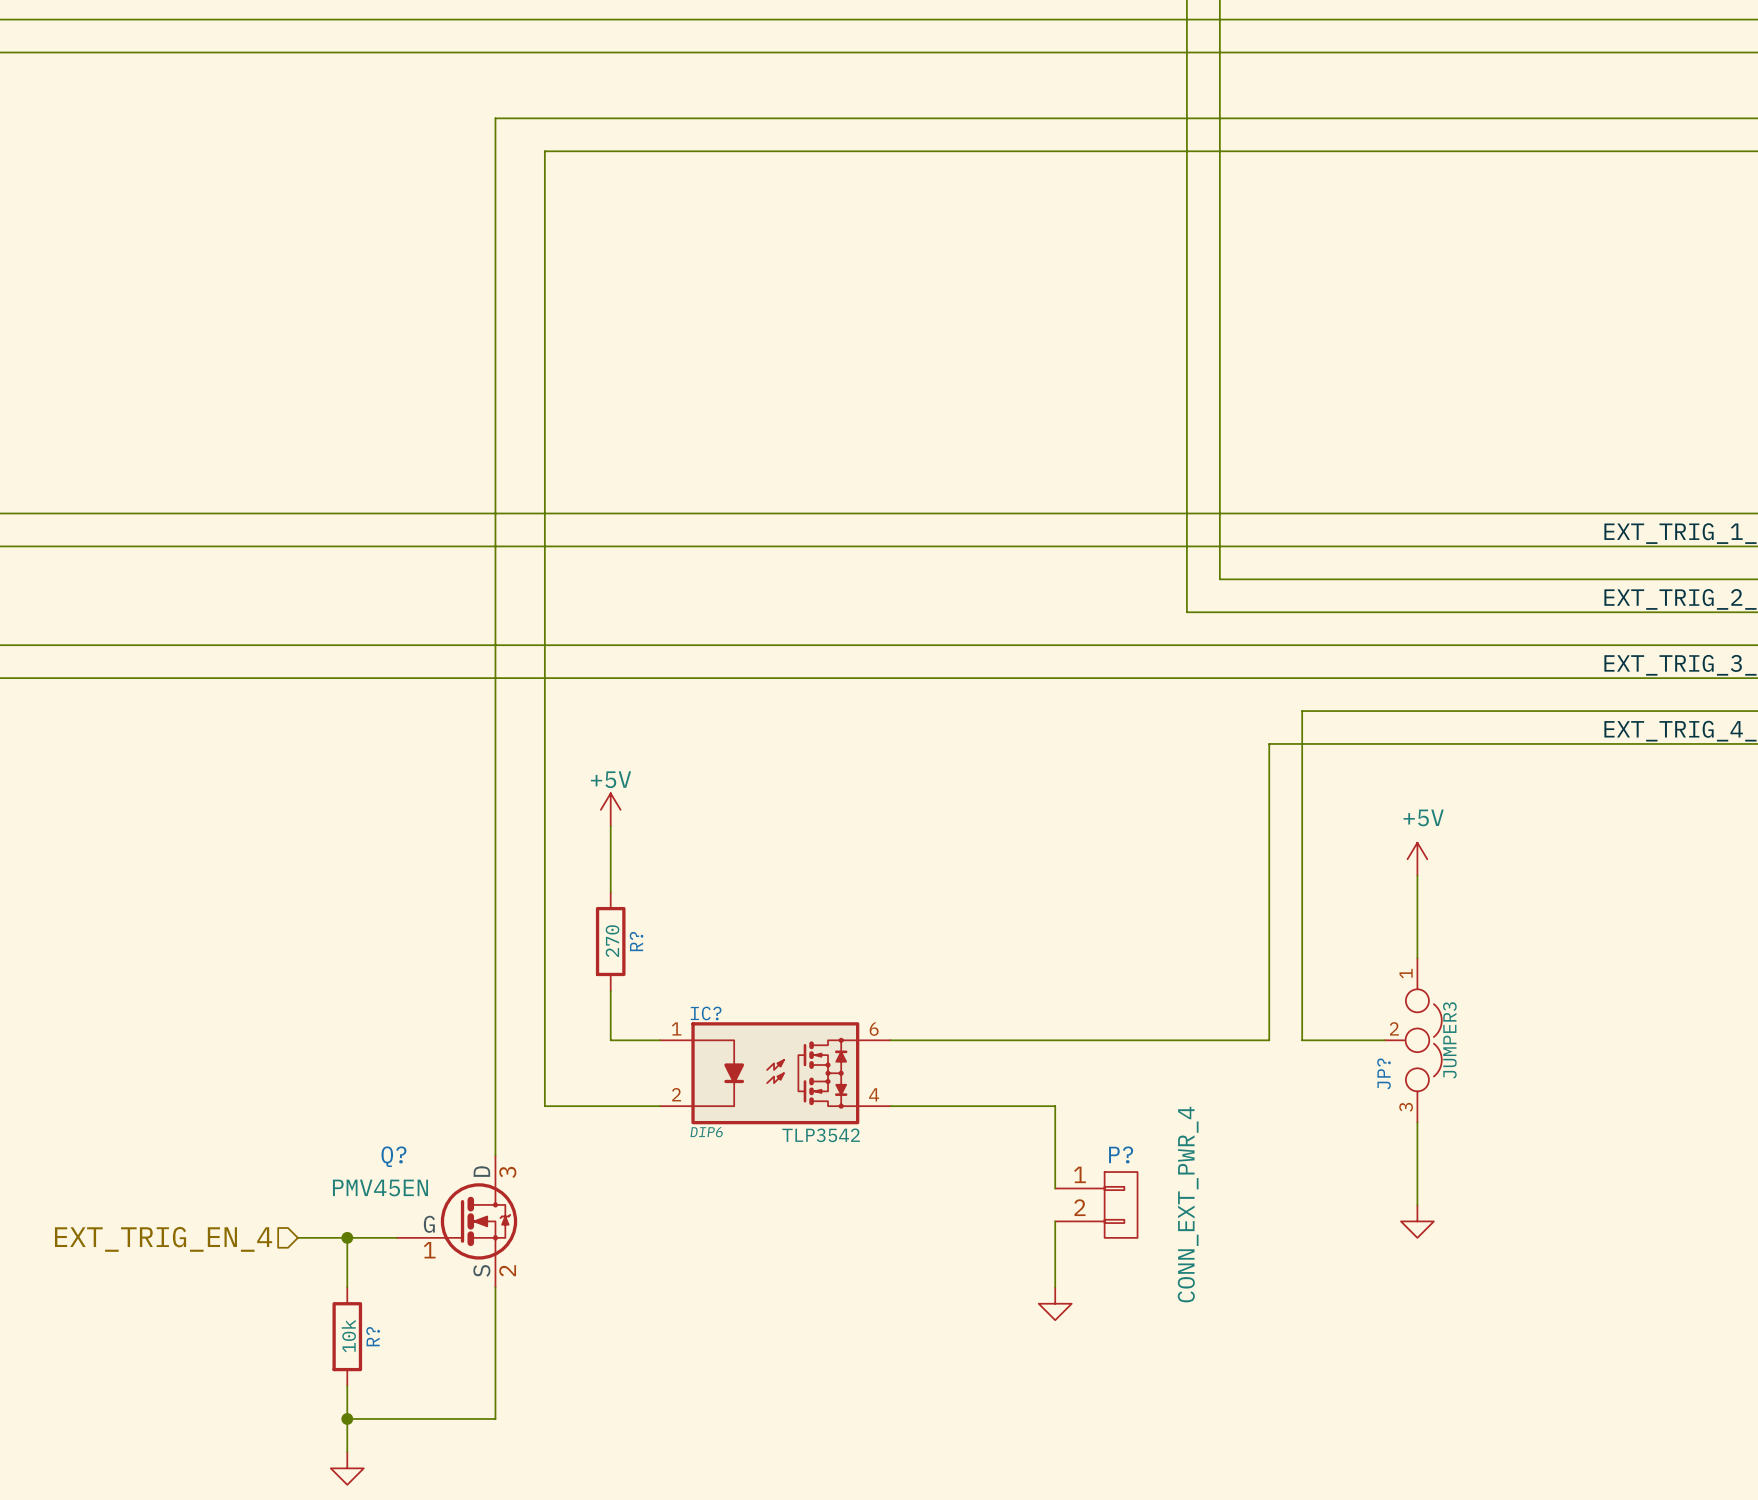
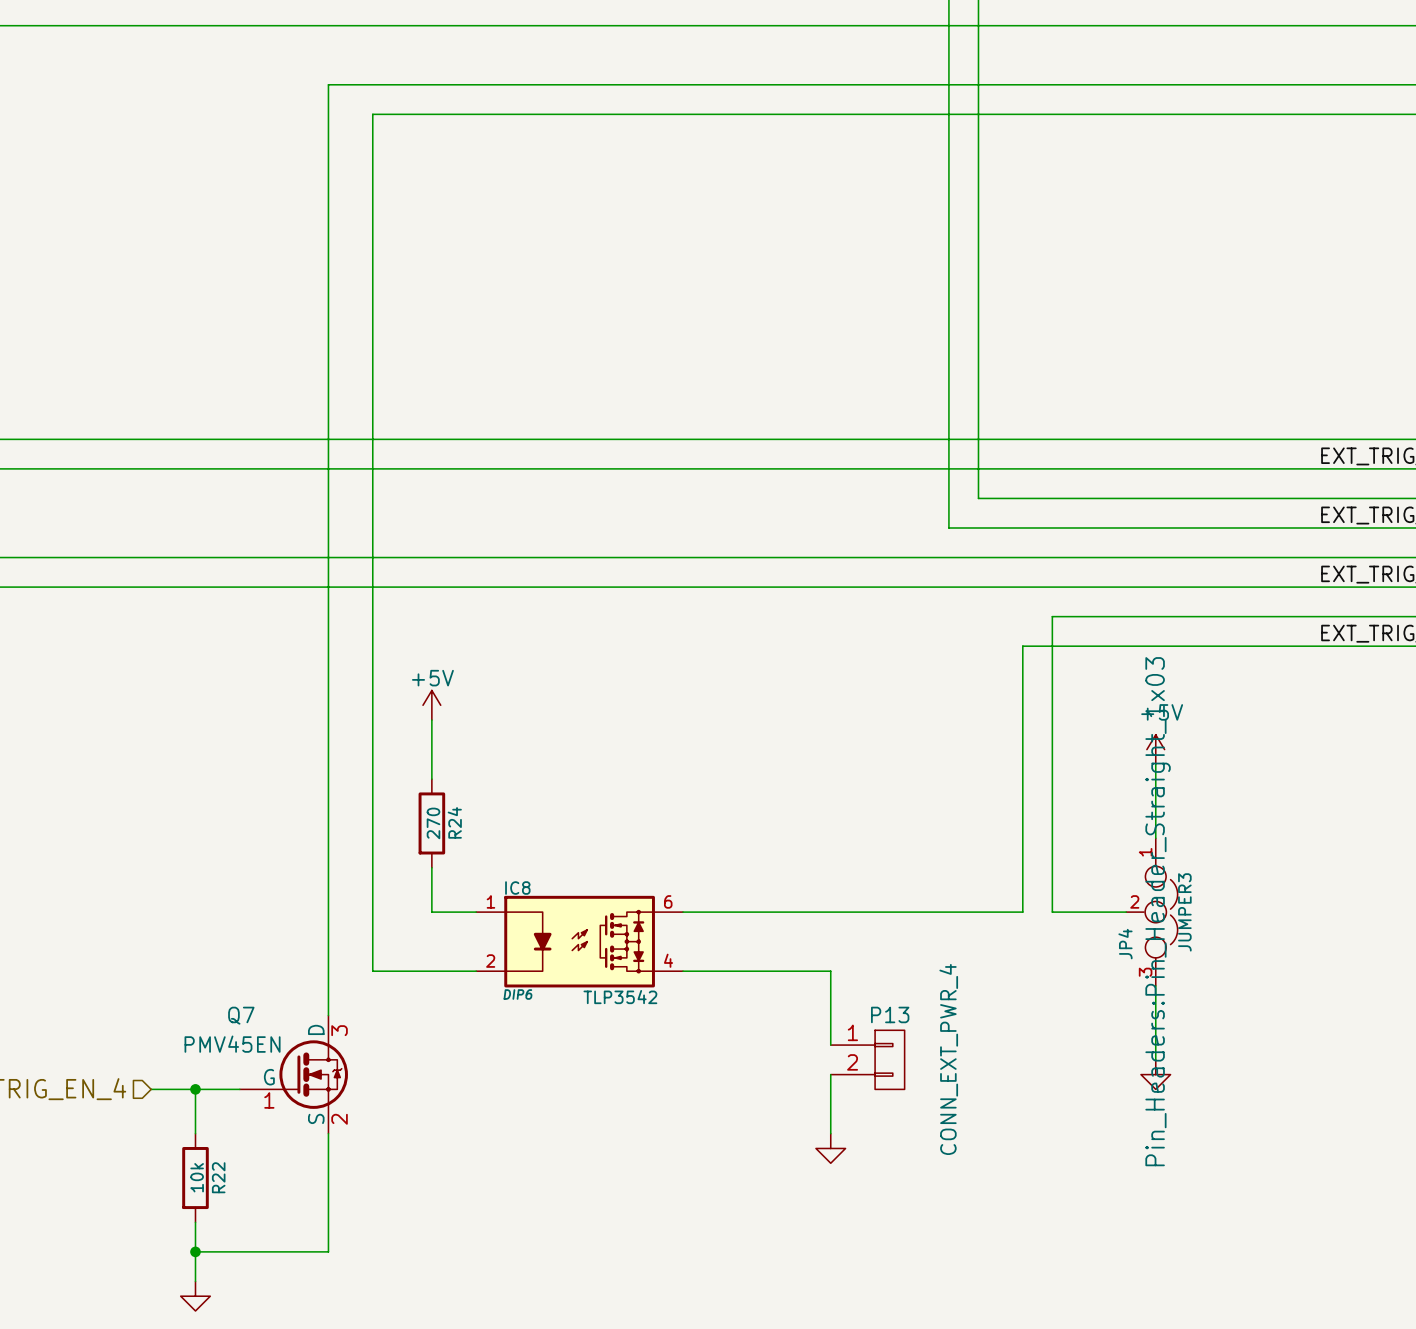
R? name: R? (636, 941) -> R24 (454, 822)
IC? name: IC? (706, 1013) -> IC8 (517, 888)
JP? text: none -> Pin_Headers:Pin_Header_Straight_1x03 (1158, 911)
JP? name: JP? (1384, 1073) -> JP4 (1125, 944)
P? name: P? (1121, 1154) -> P13 (890, 1014)
Q? name: Q? (393, 1156) -> Q7 (241, 1015)
R? name: R? (373, 1336) -> R22 (218, 1177)

